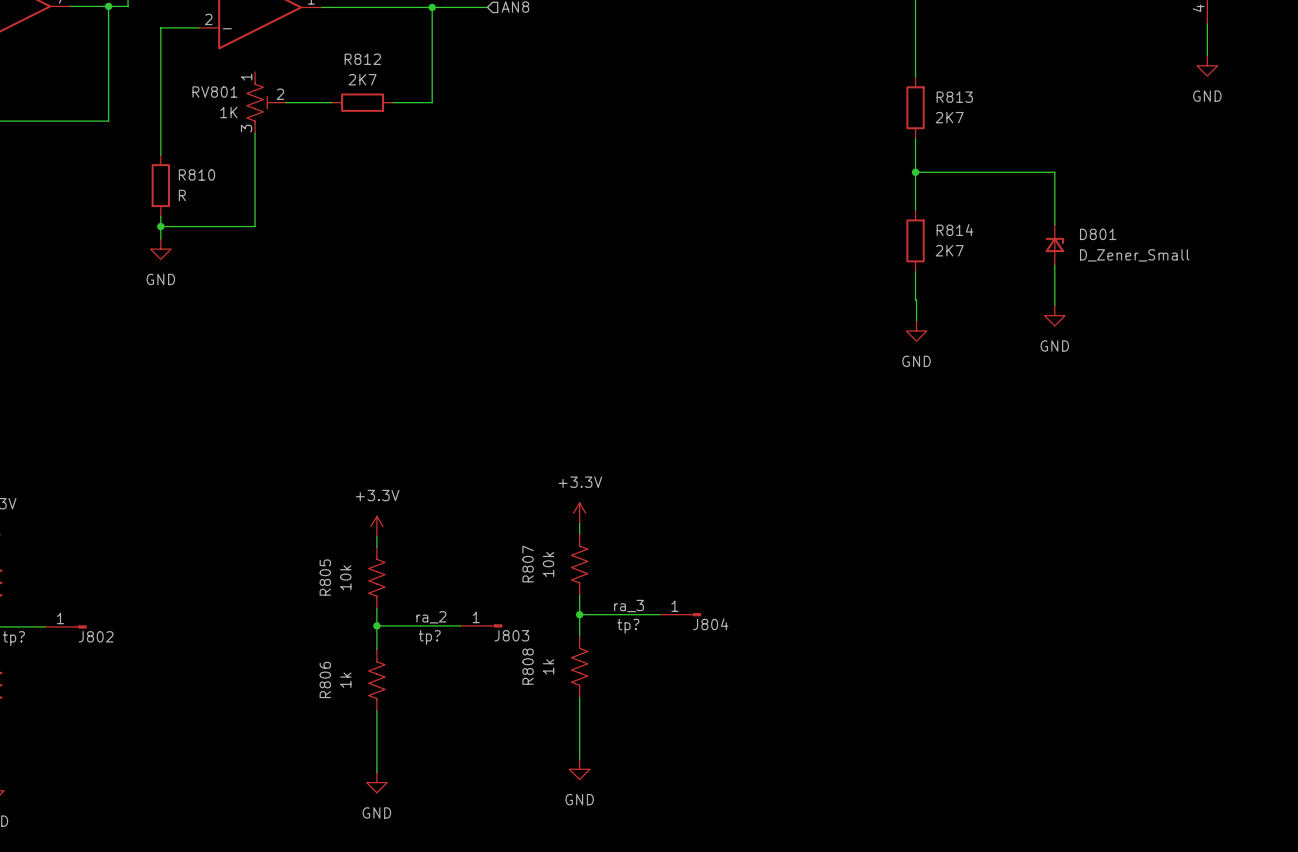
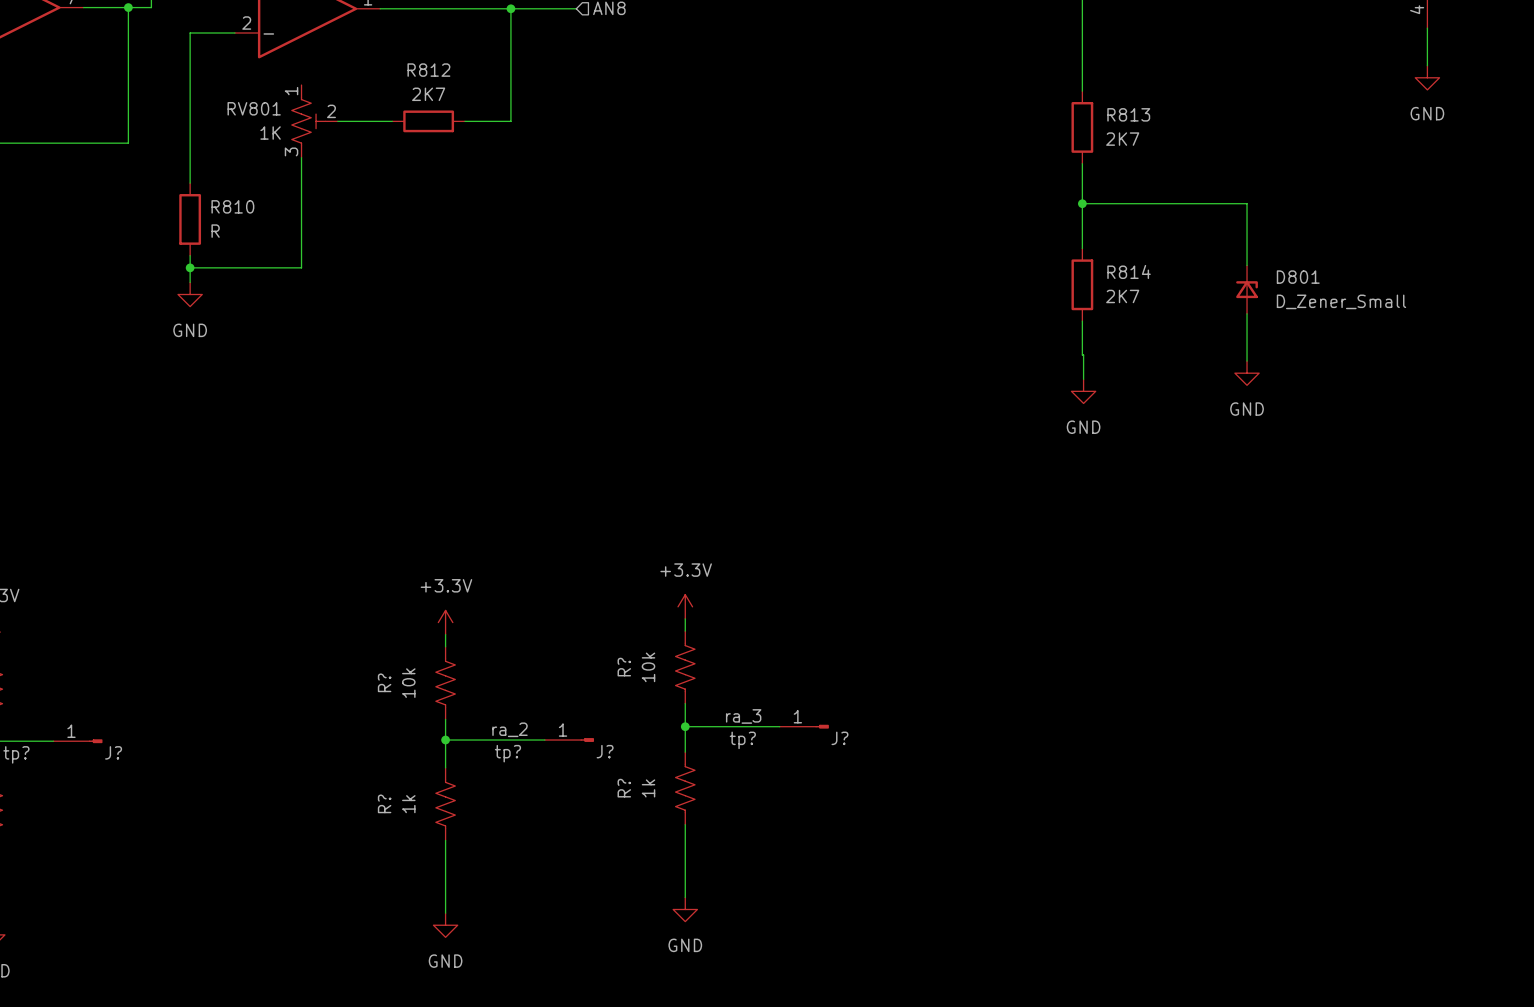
R807 name: R807 (528, 564) -> R? (624, 667)
R805 name: R805 (325, 577) -> R? (384, 682)
J804 name: J804 (710, 624) -> J? (839, 738)
J803 name: J803 (511, 635) -> J? (605, 751)
J802 name: J802 (96, 636) -> J? (113, 752)
R808 name: R808 (528, 666) -> R? (624, 788)
R806 name: R806 (325, 679) -> R? (384, 803)

